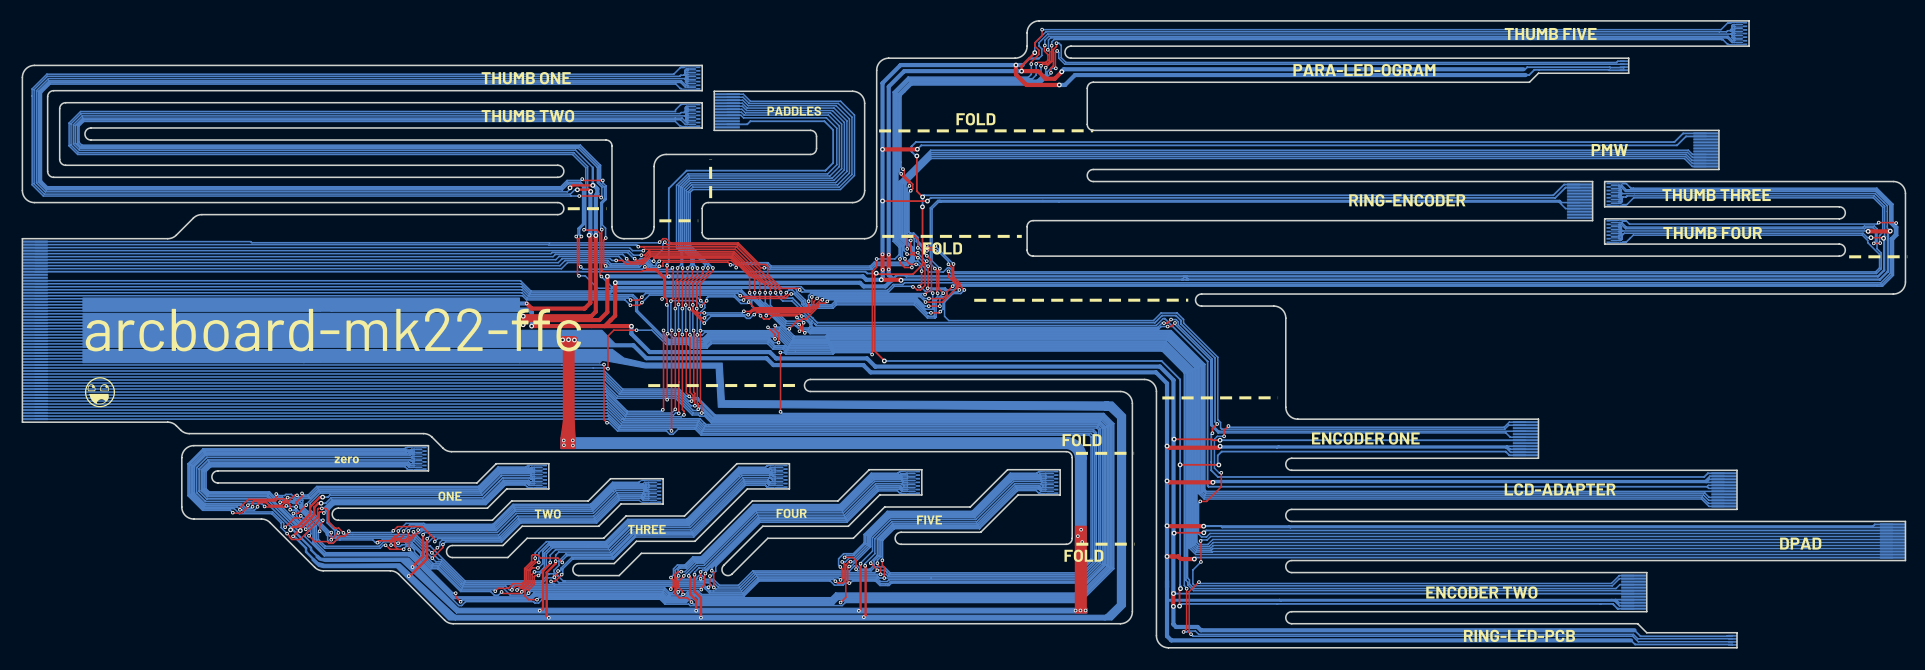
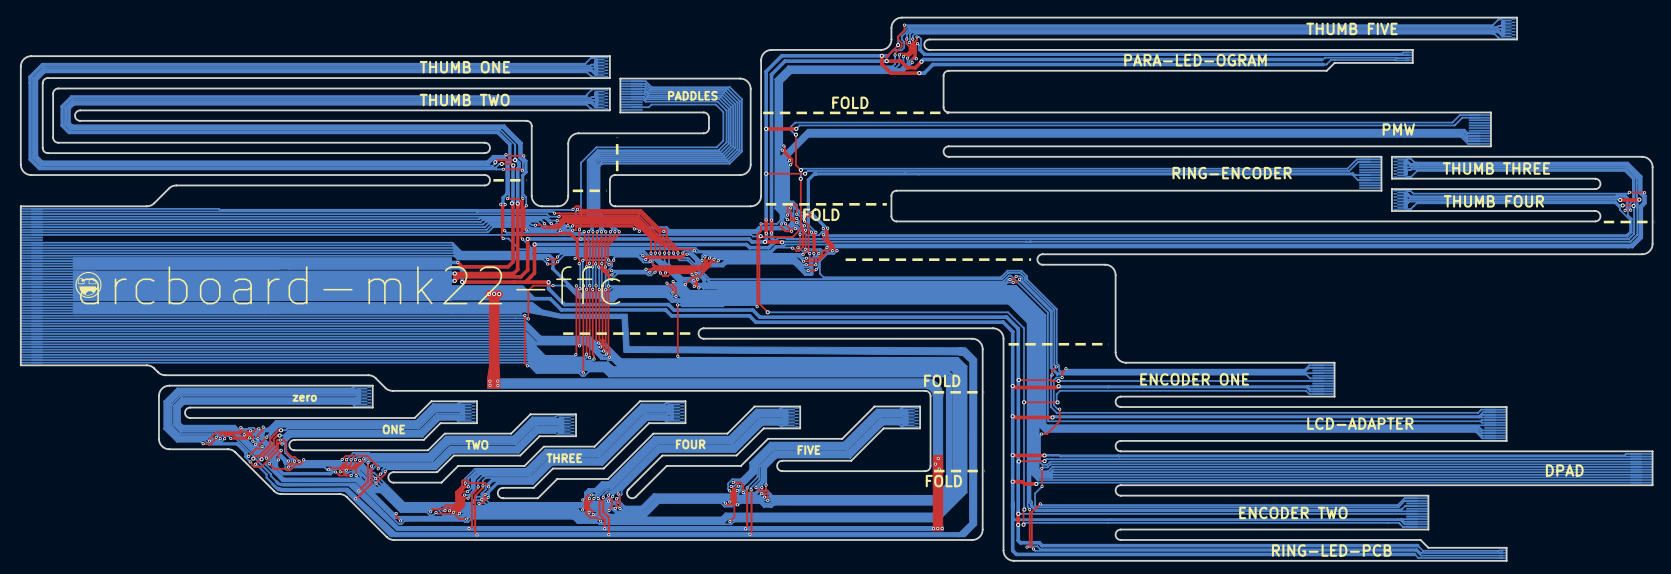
drawing position: (99, 392) -> (88, 284)

